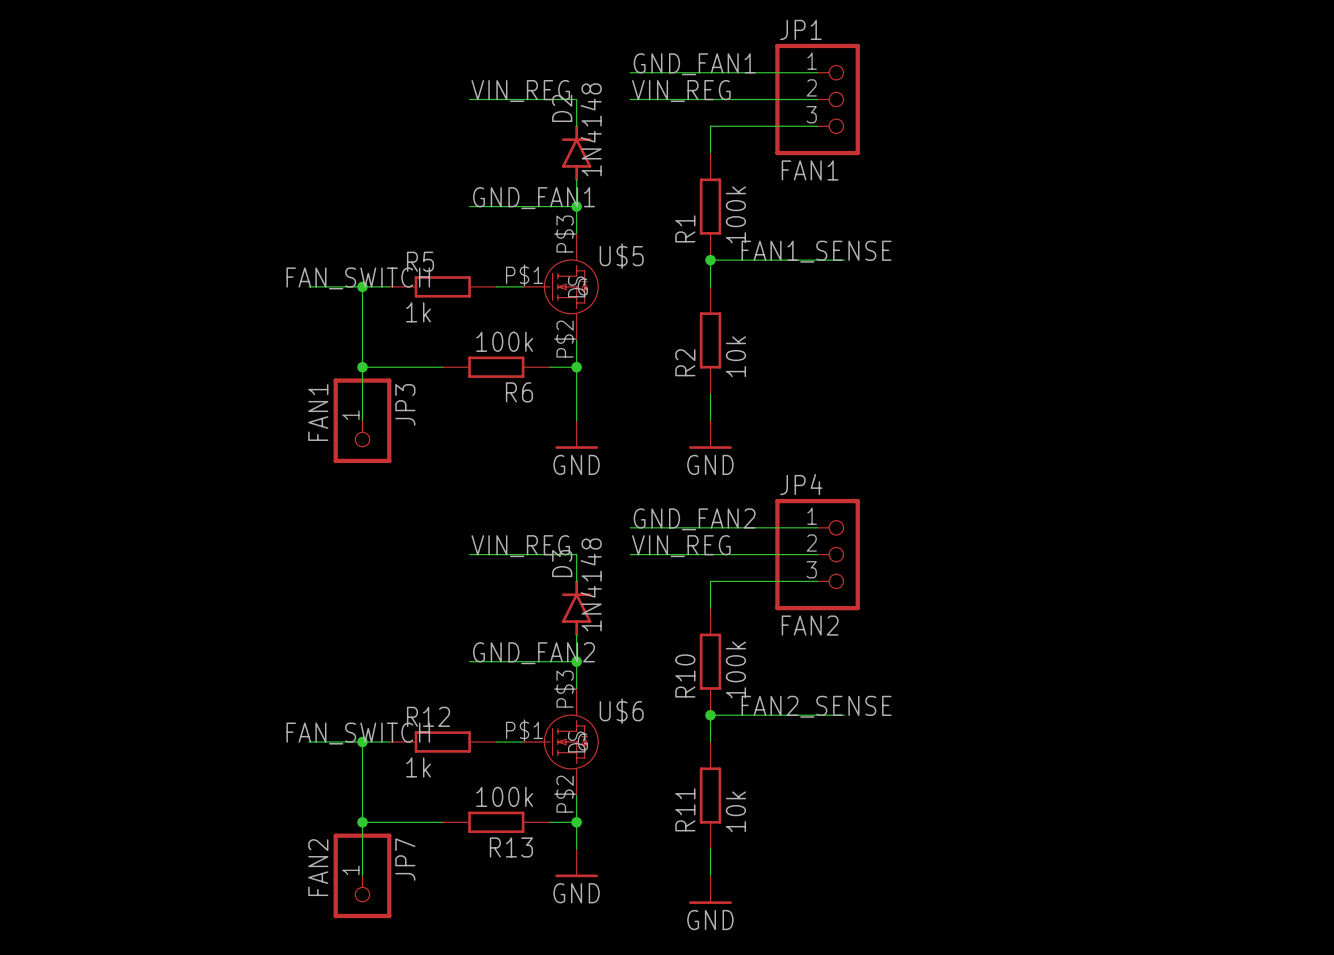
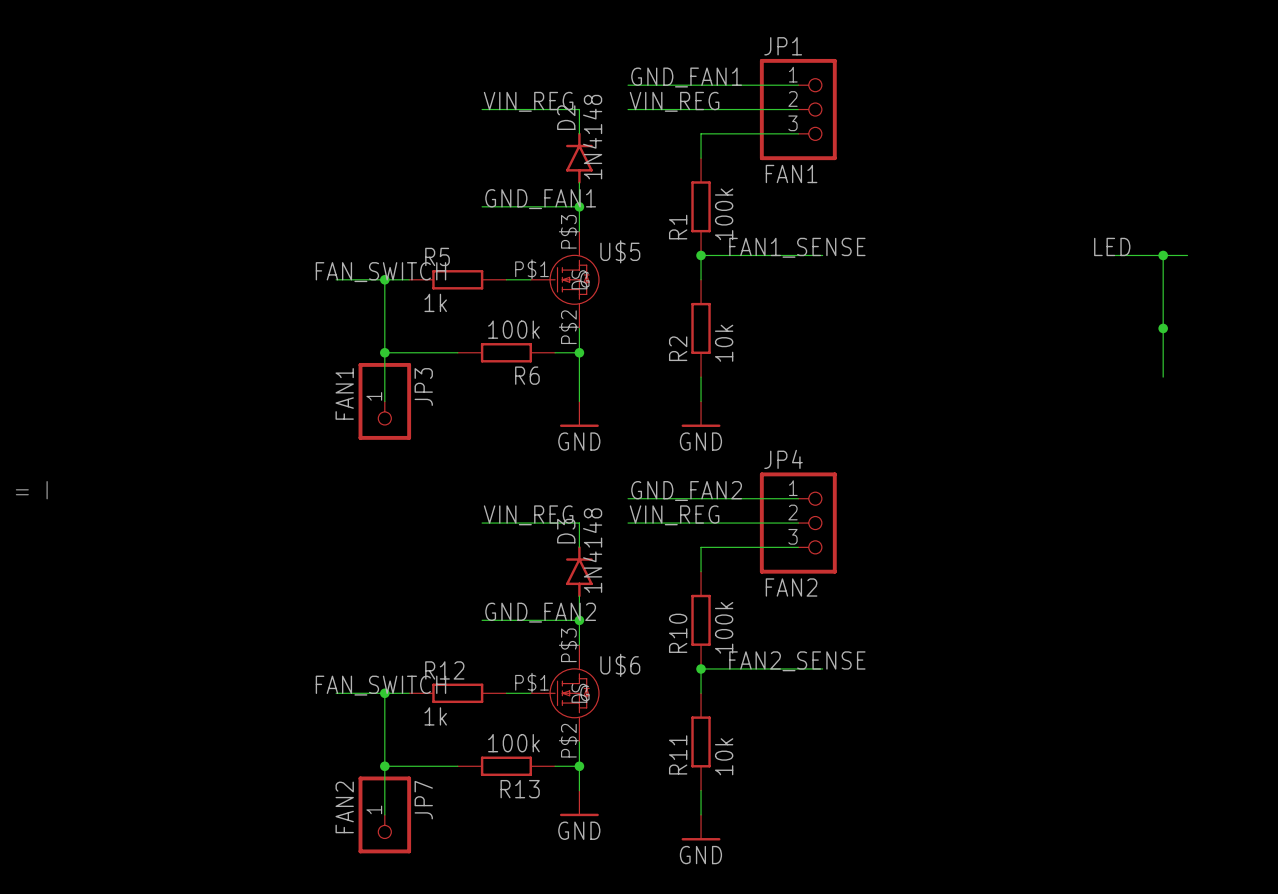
label: none -> LED (1112, 246)
wire: none -> (1114, 255) (1187, 255)
wire: none -> (1163, 255) (1163, 377)
junction: none -> (1163, 255)
junction: none -> (1163, 328)

